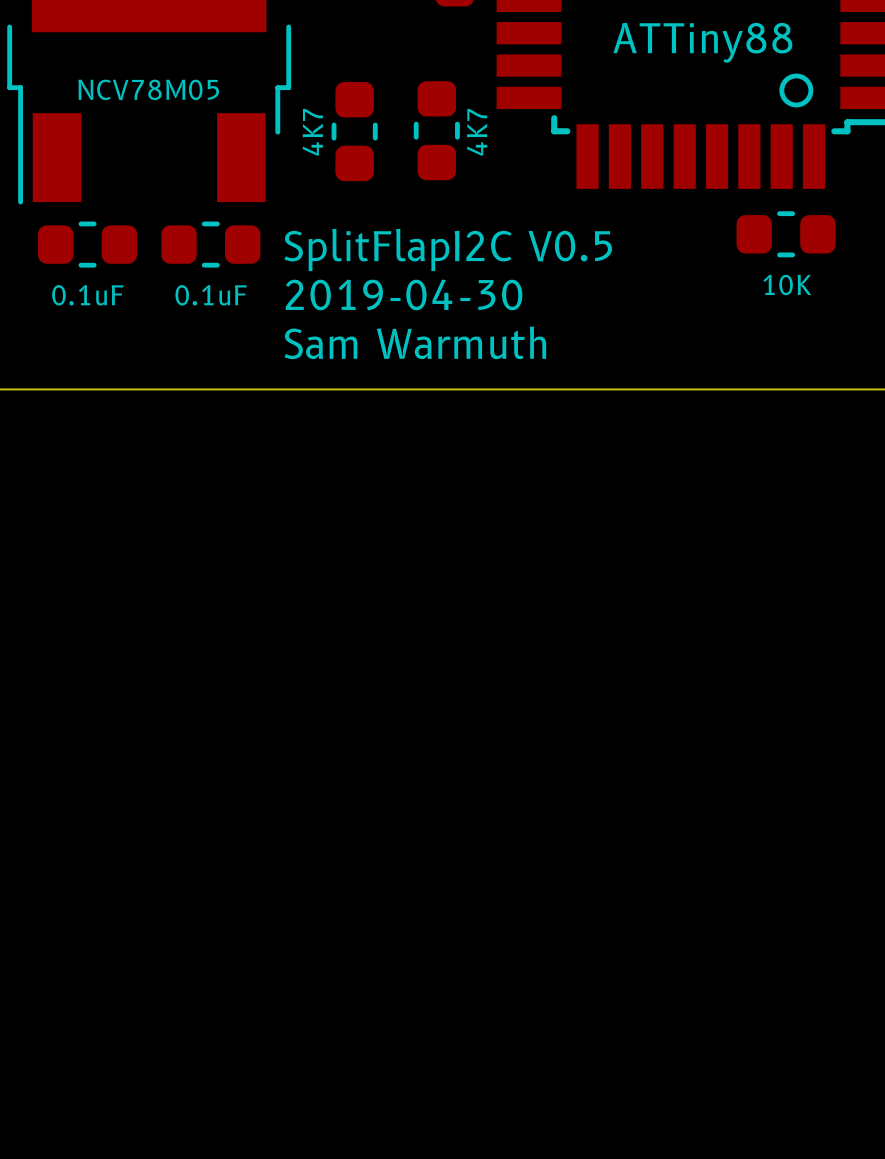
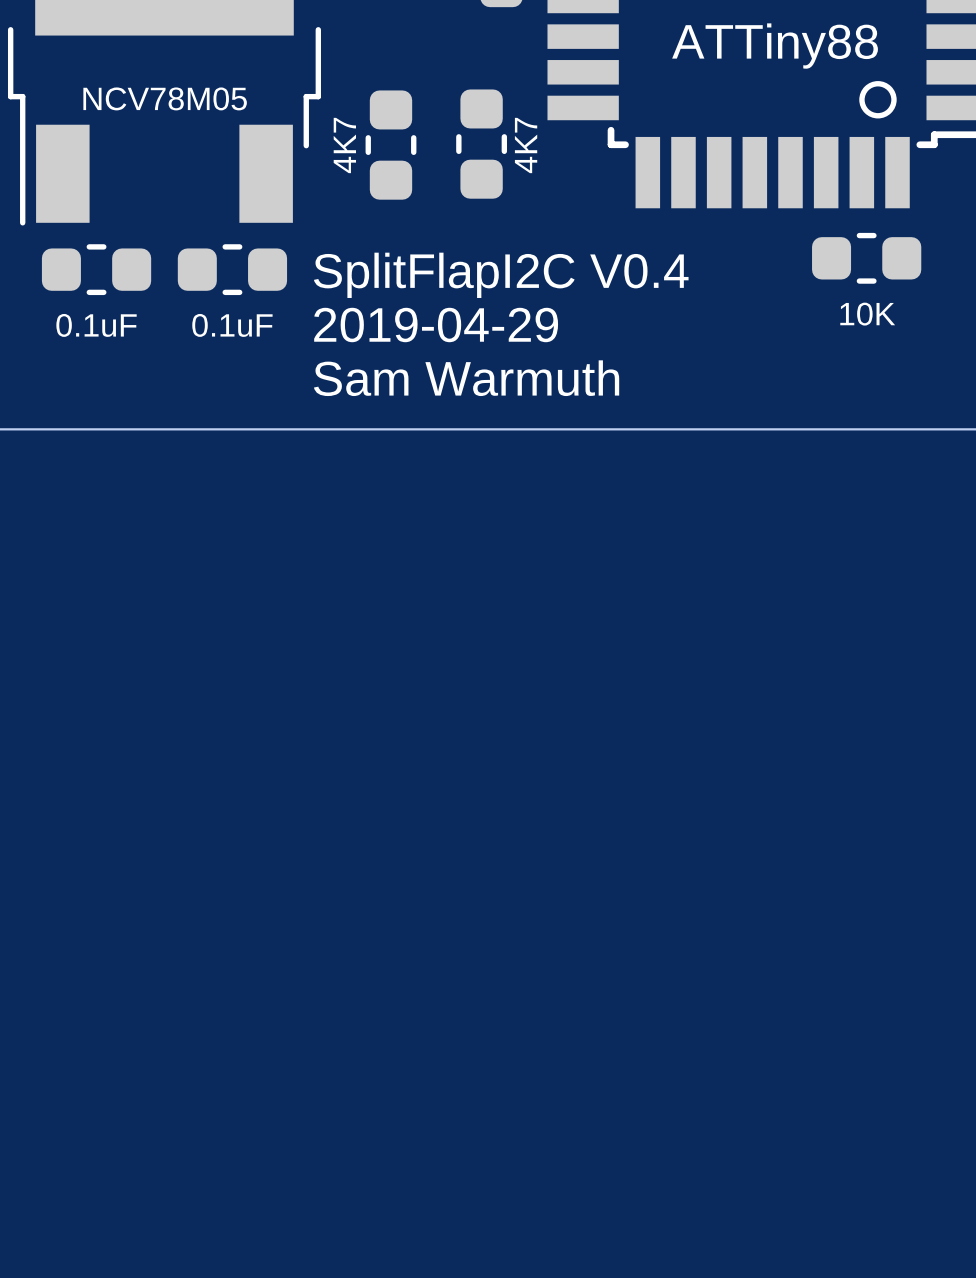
text: SplitFlapI2C V0.5 (448, 249) -> SplitFlapI2C V0.4 (501, 275)
text: 2019-04-30 (404, 294) -> 2019-04-29 (436, 325)

